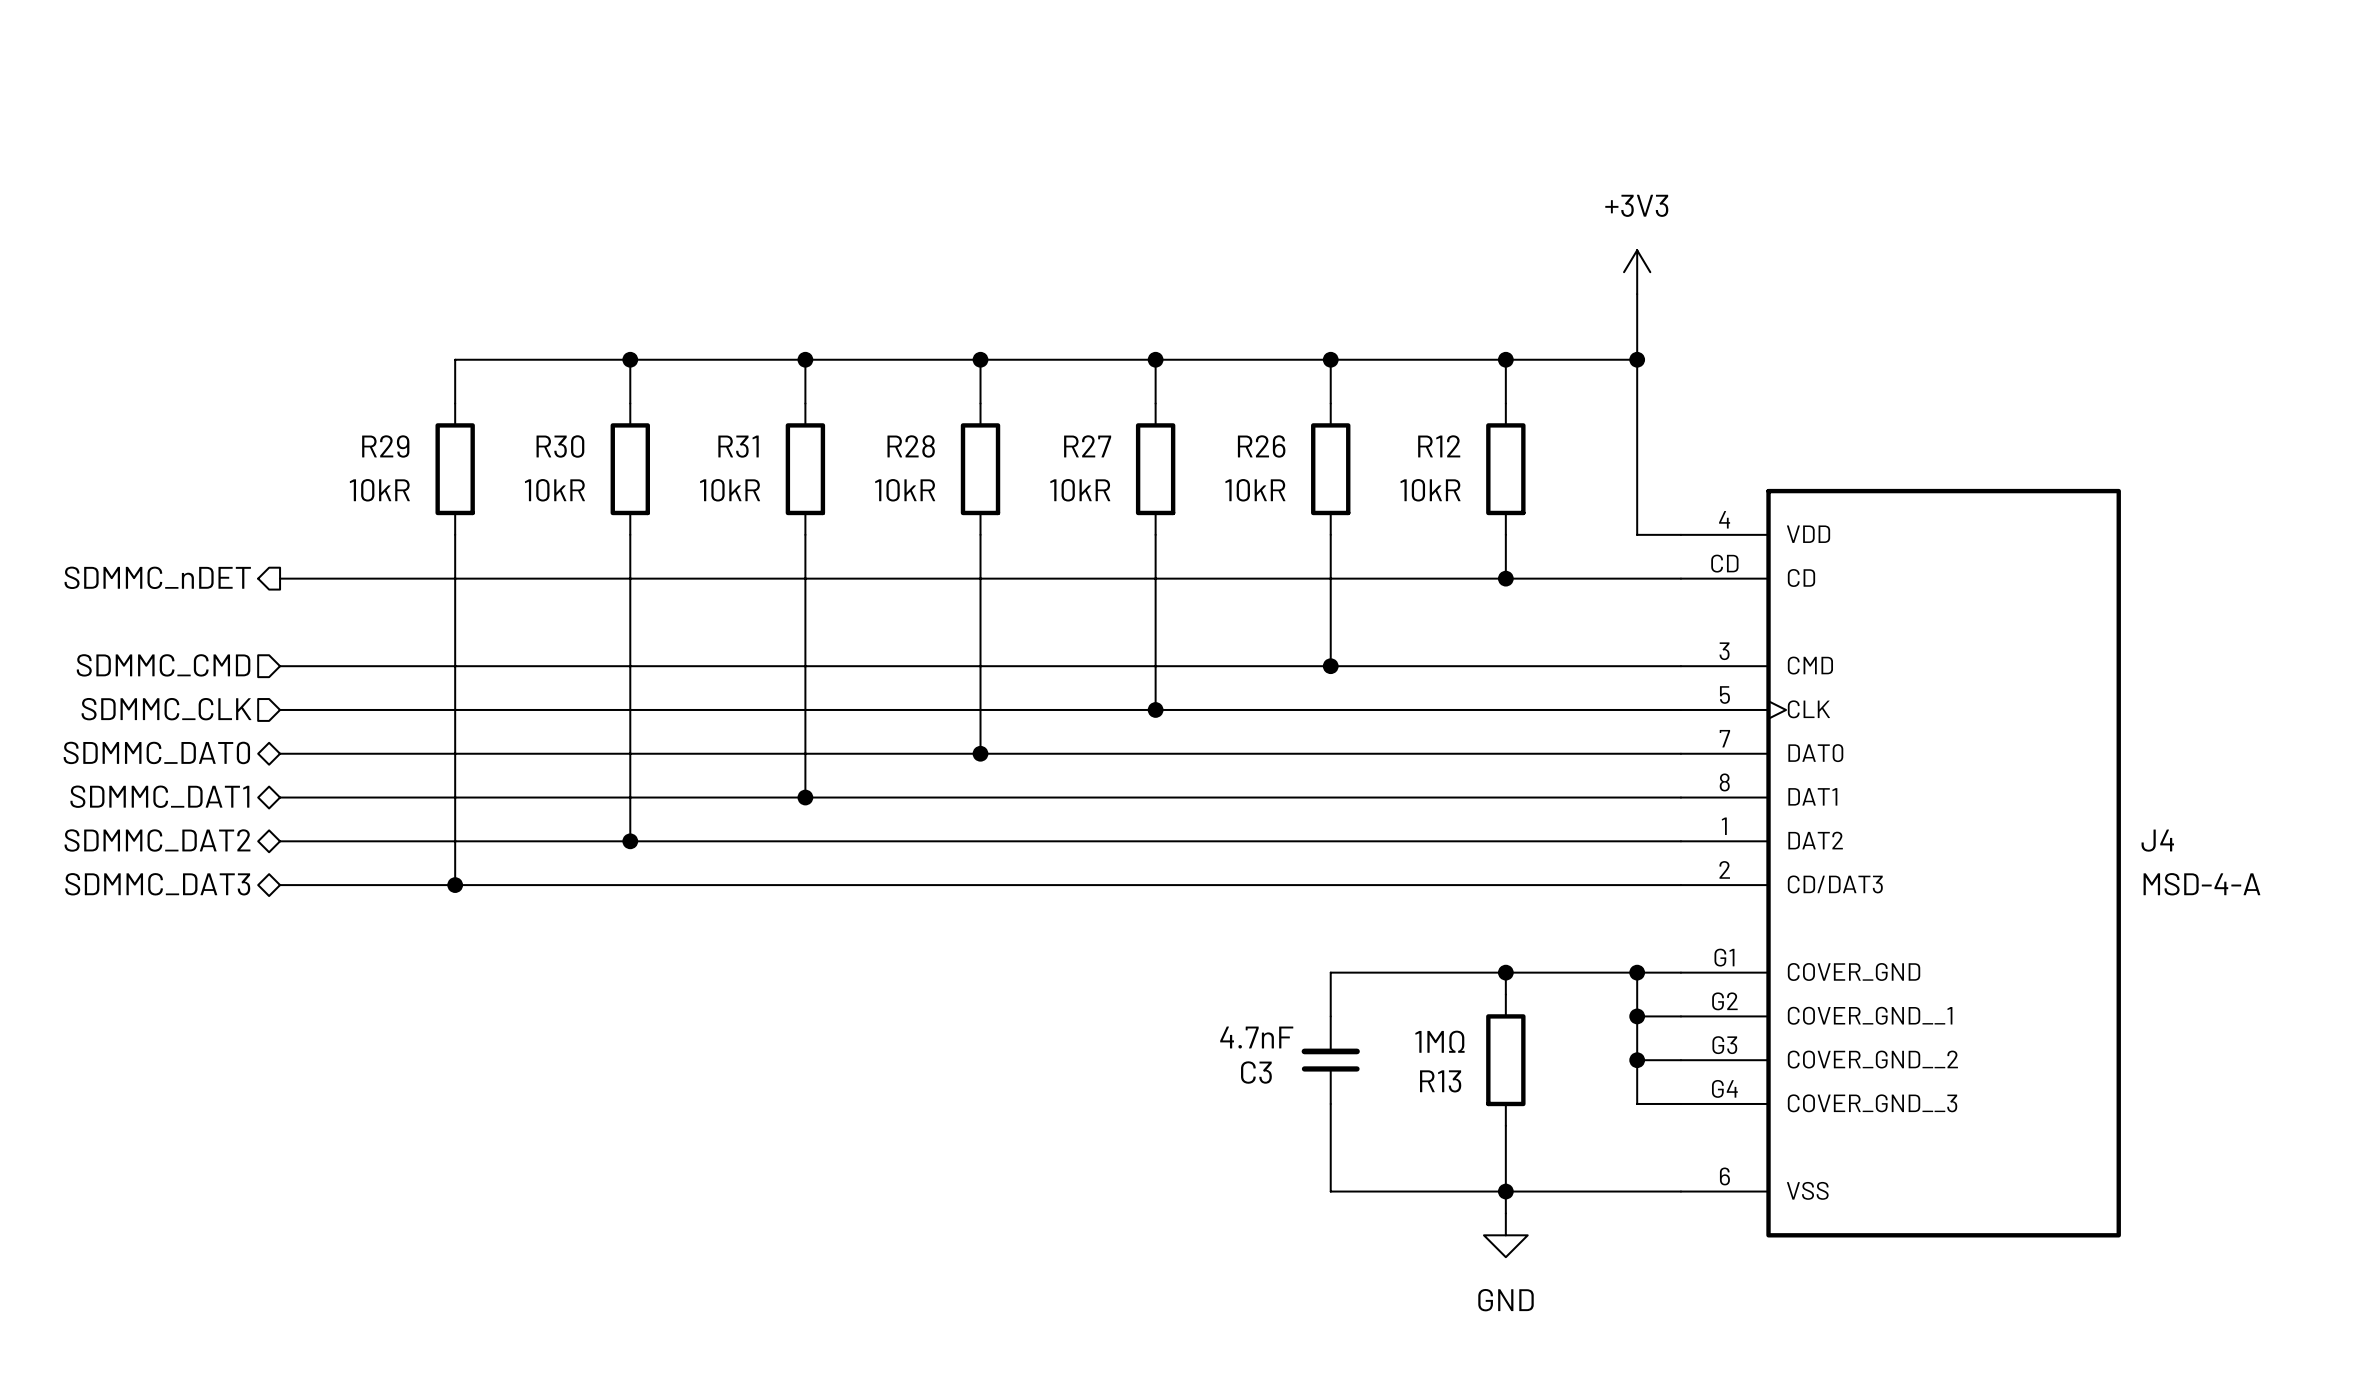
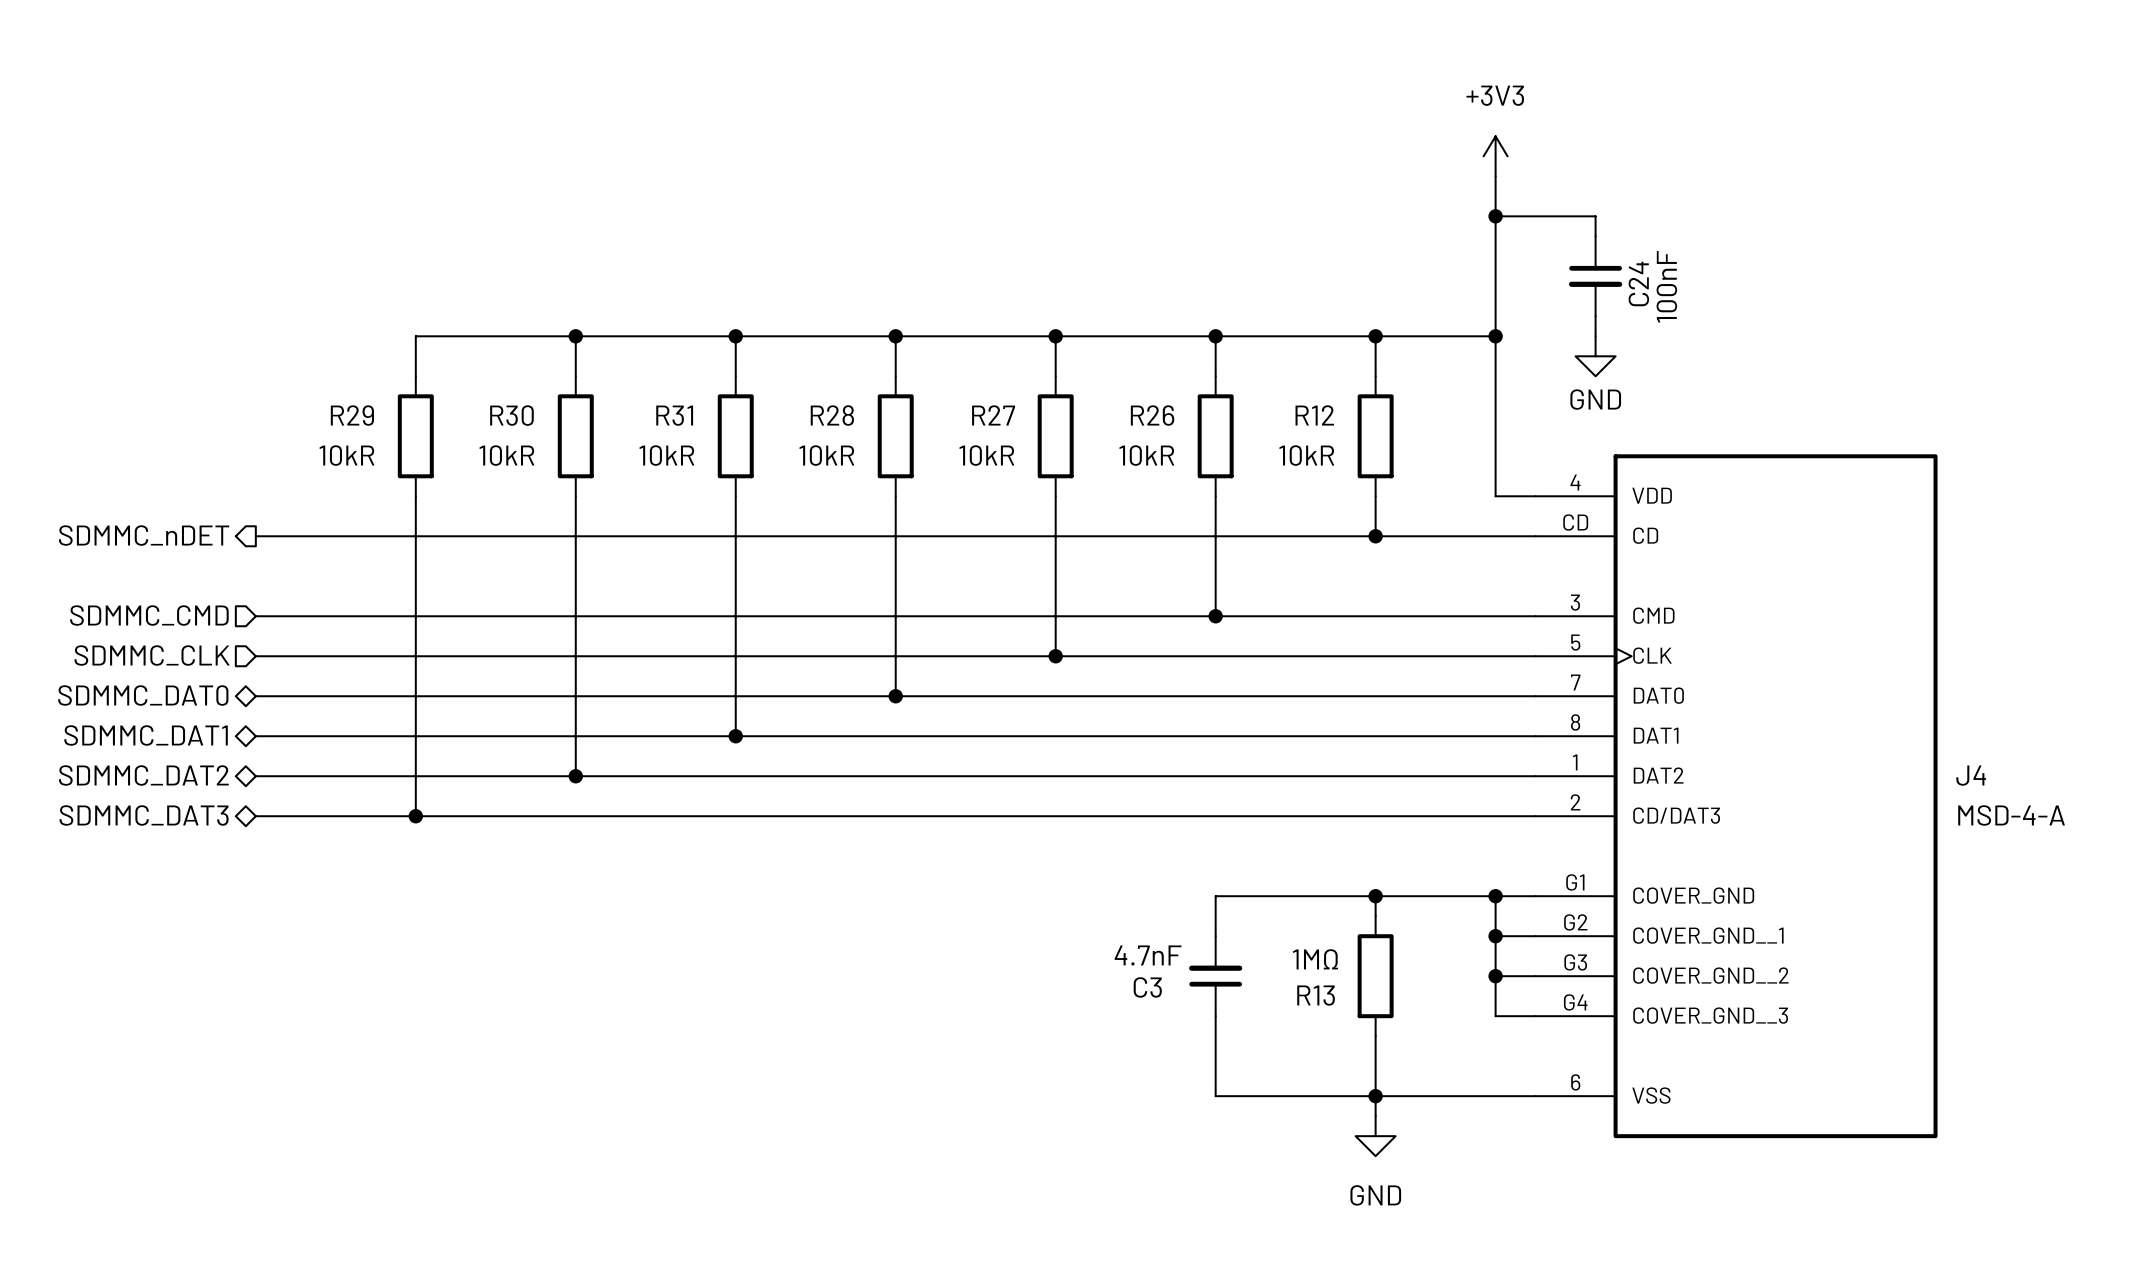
wire: none -> (1495, 176) (1495, 276)
wire: none -> (1495, 216) (1595, 216) (1595, 236)
junction: none -> (1495, 216)
power symbol position: +3V3 (1637, 272) -> +3V3 (1495, 156)
C24: none -> 100nF (1595, 276)
wire: none -> (1595, 316) (1595, 336)
power symbol: none -> GND (1595, 356)

